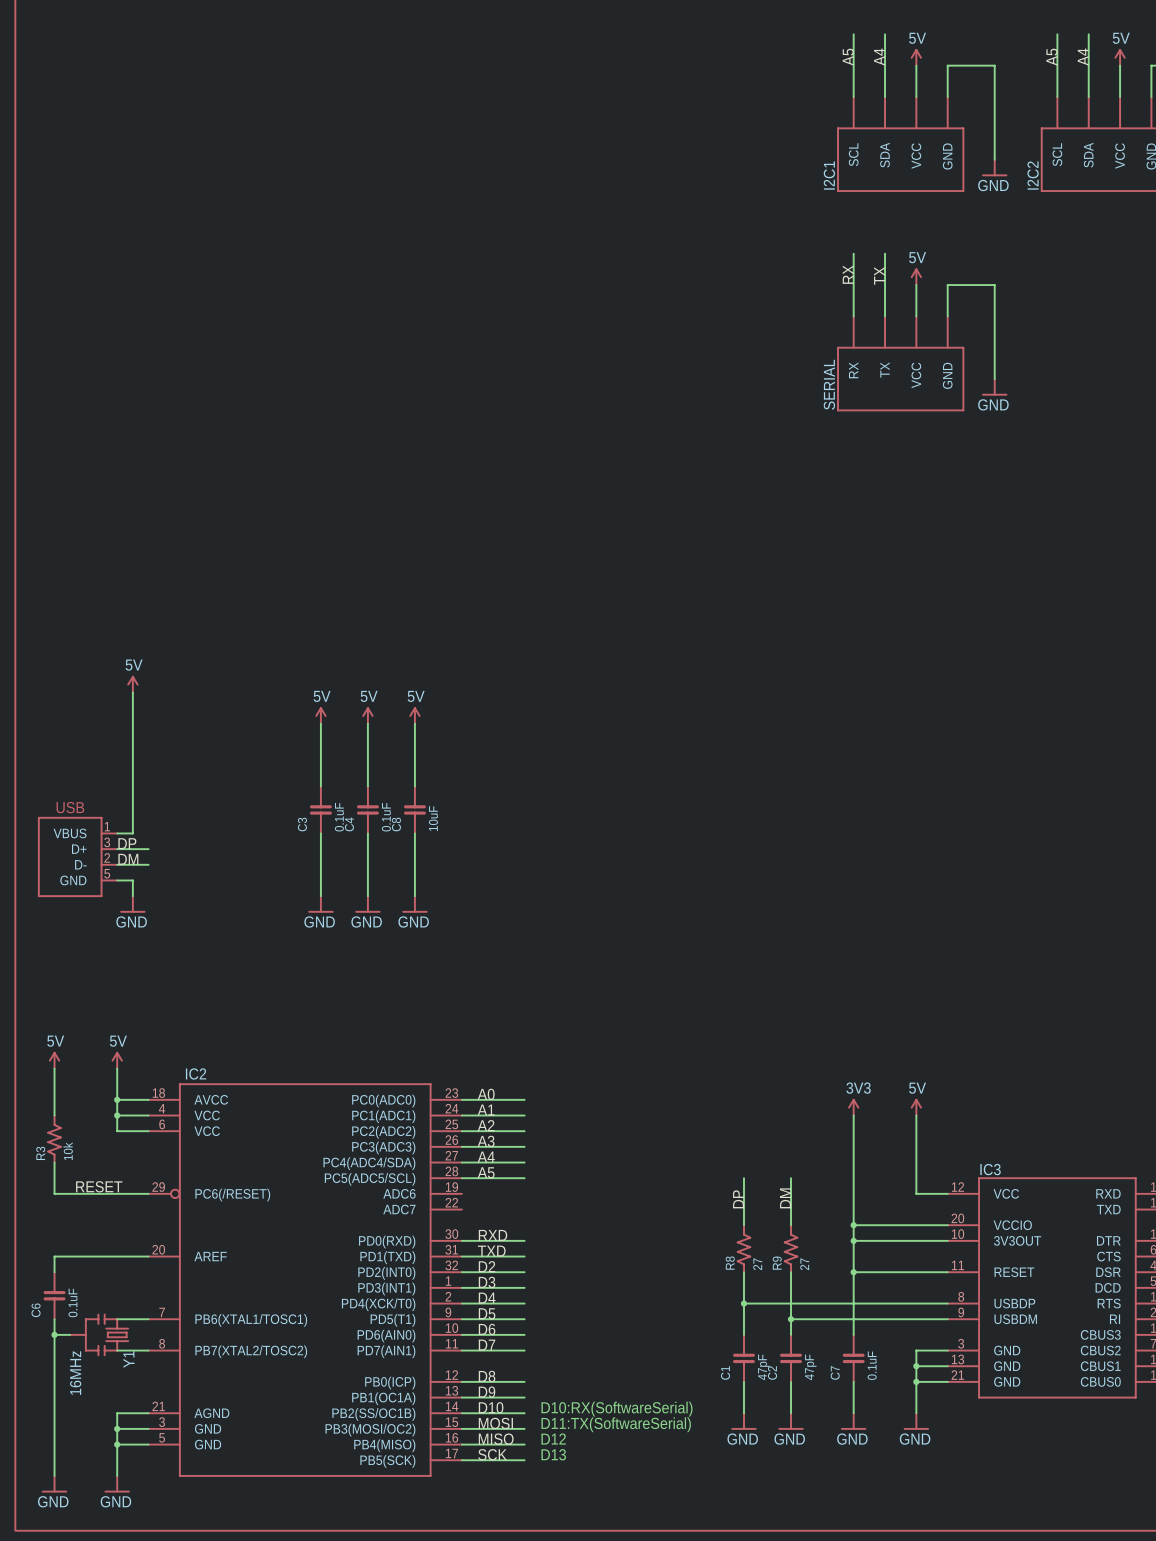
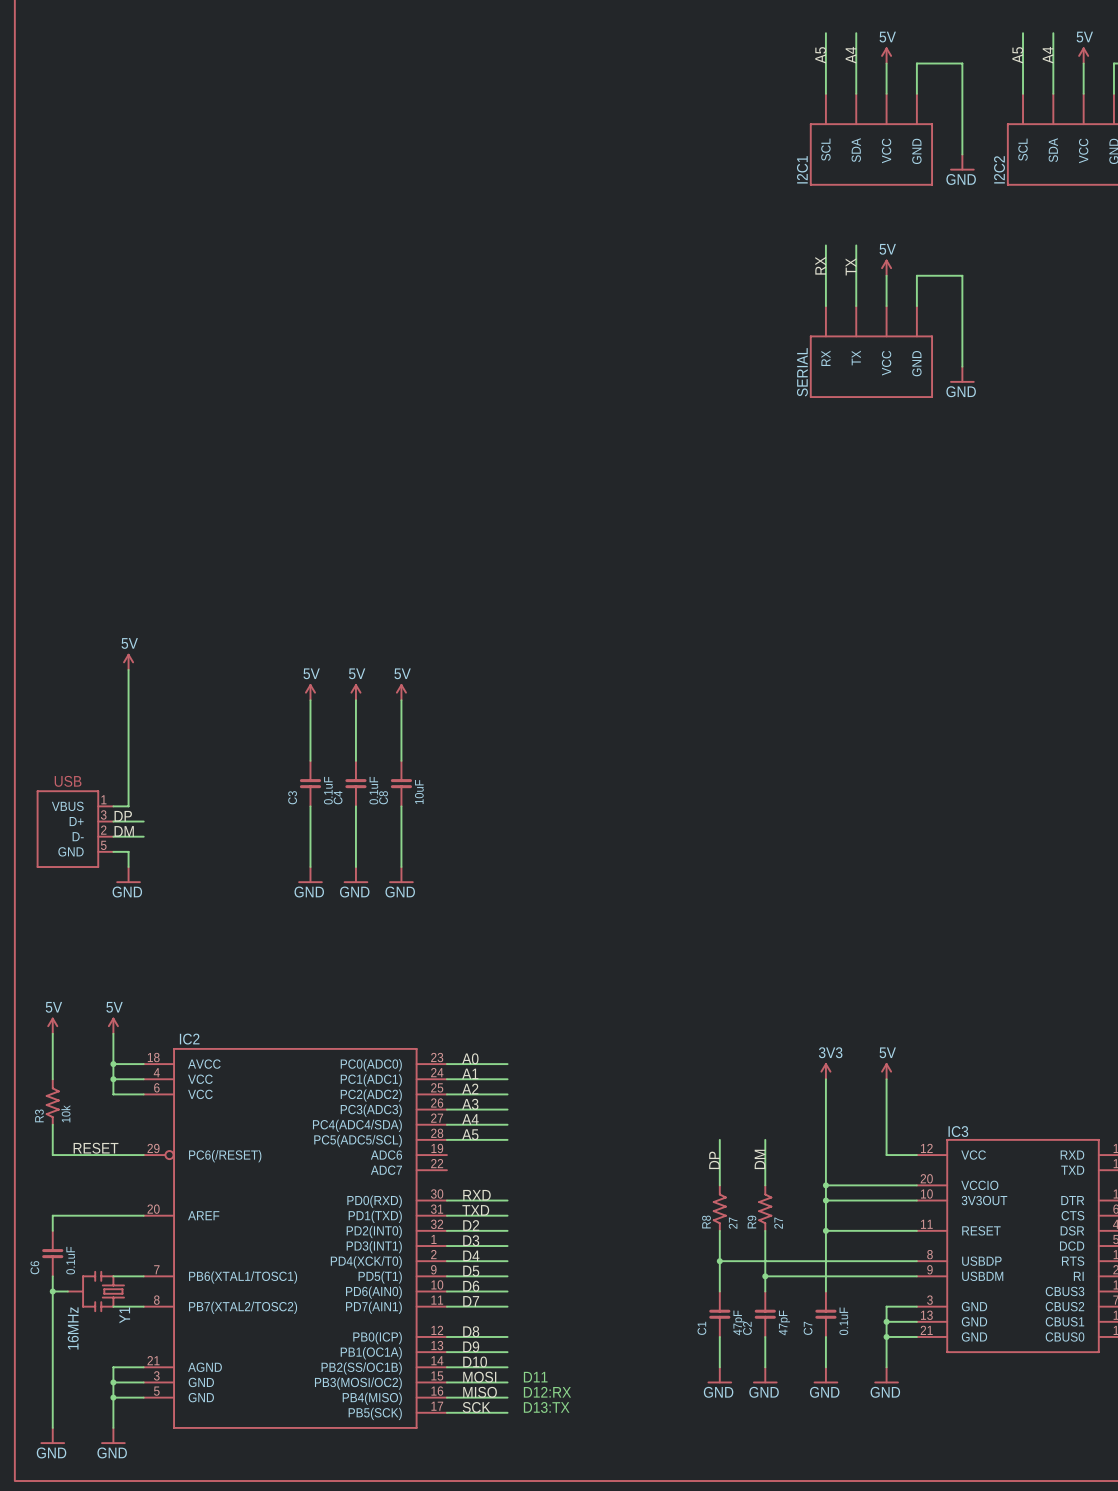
text: D10:RX(SoftwareSerial) (616, 1409) -> none
text: D11:TX(SoftwareSerial) (616, 1424) -> D11 (535, 1377)
text: D12 (553, 1439) -> D12:RX (547, 1392)
text: D13 (553, 1454) -> D13:TX (546, 1407)

